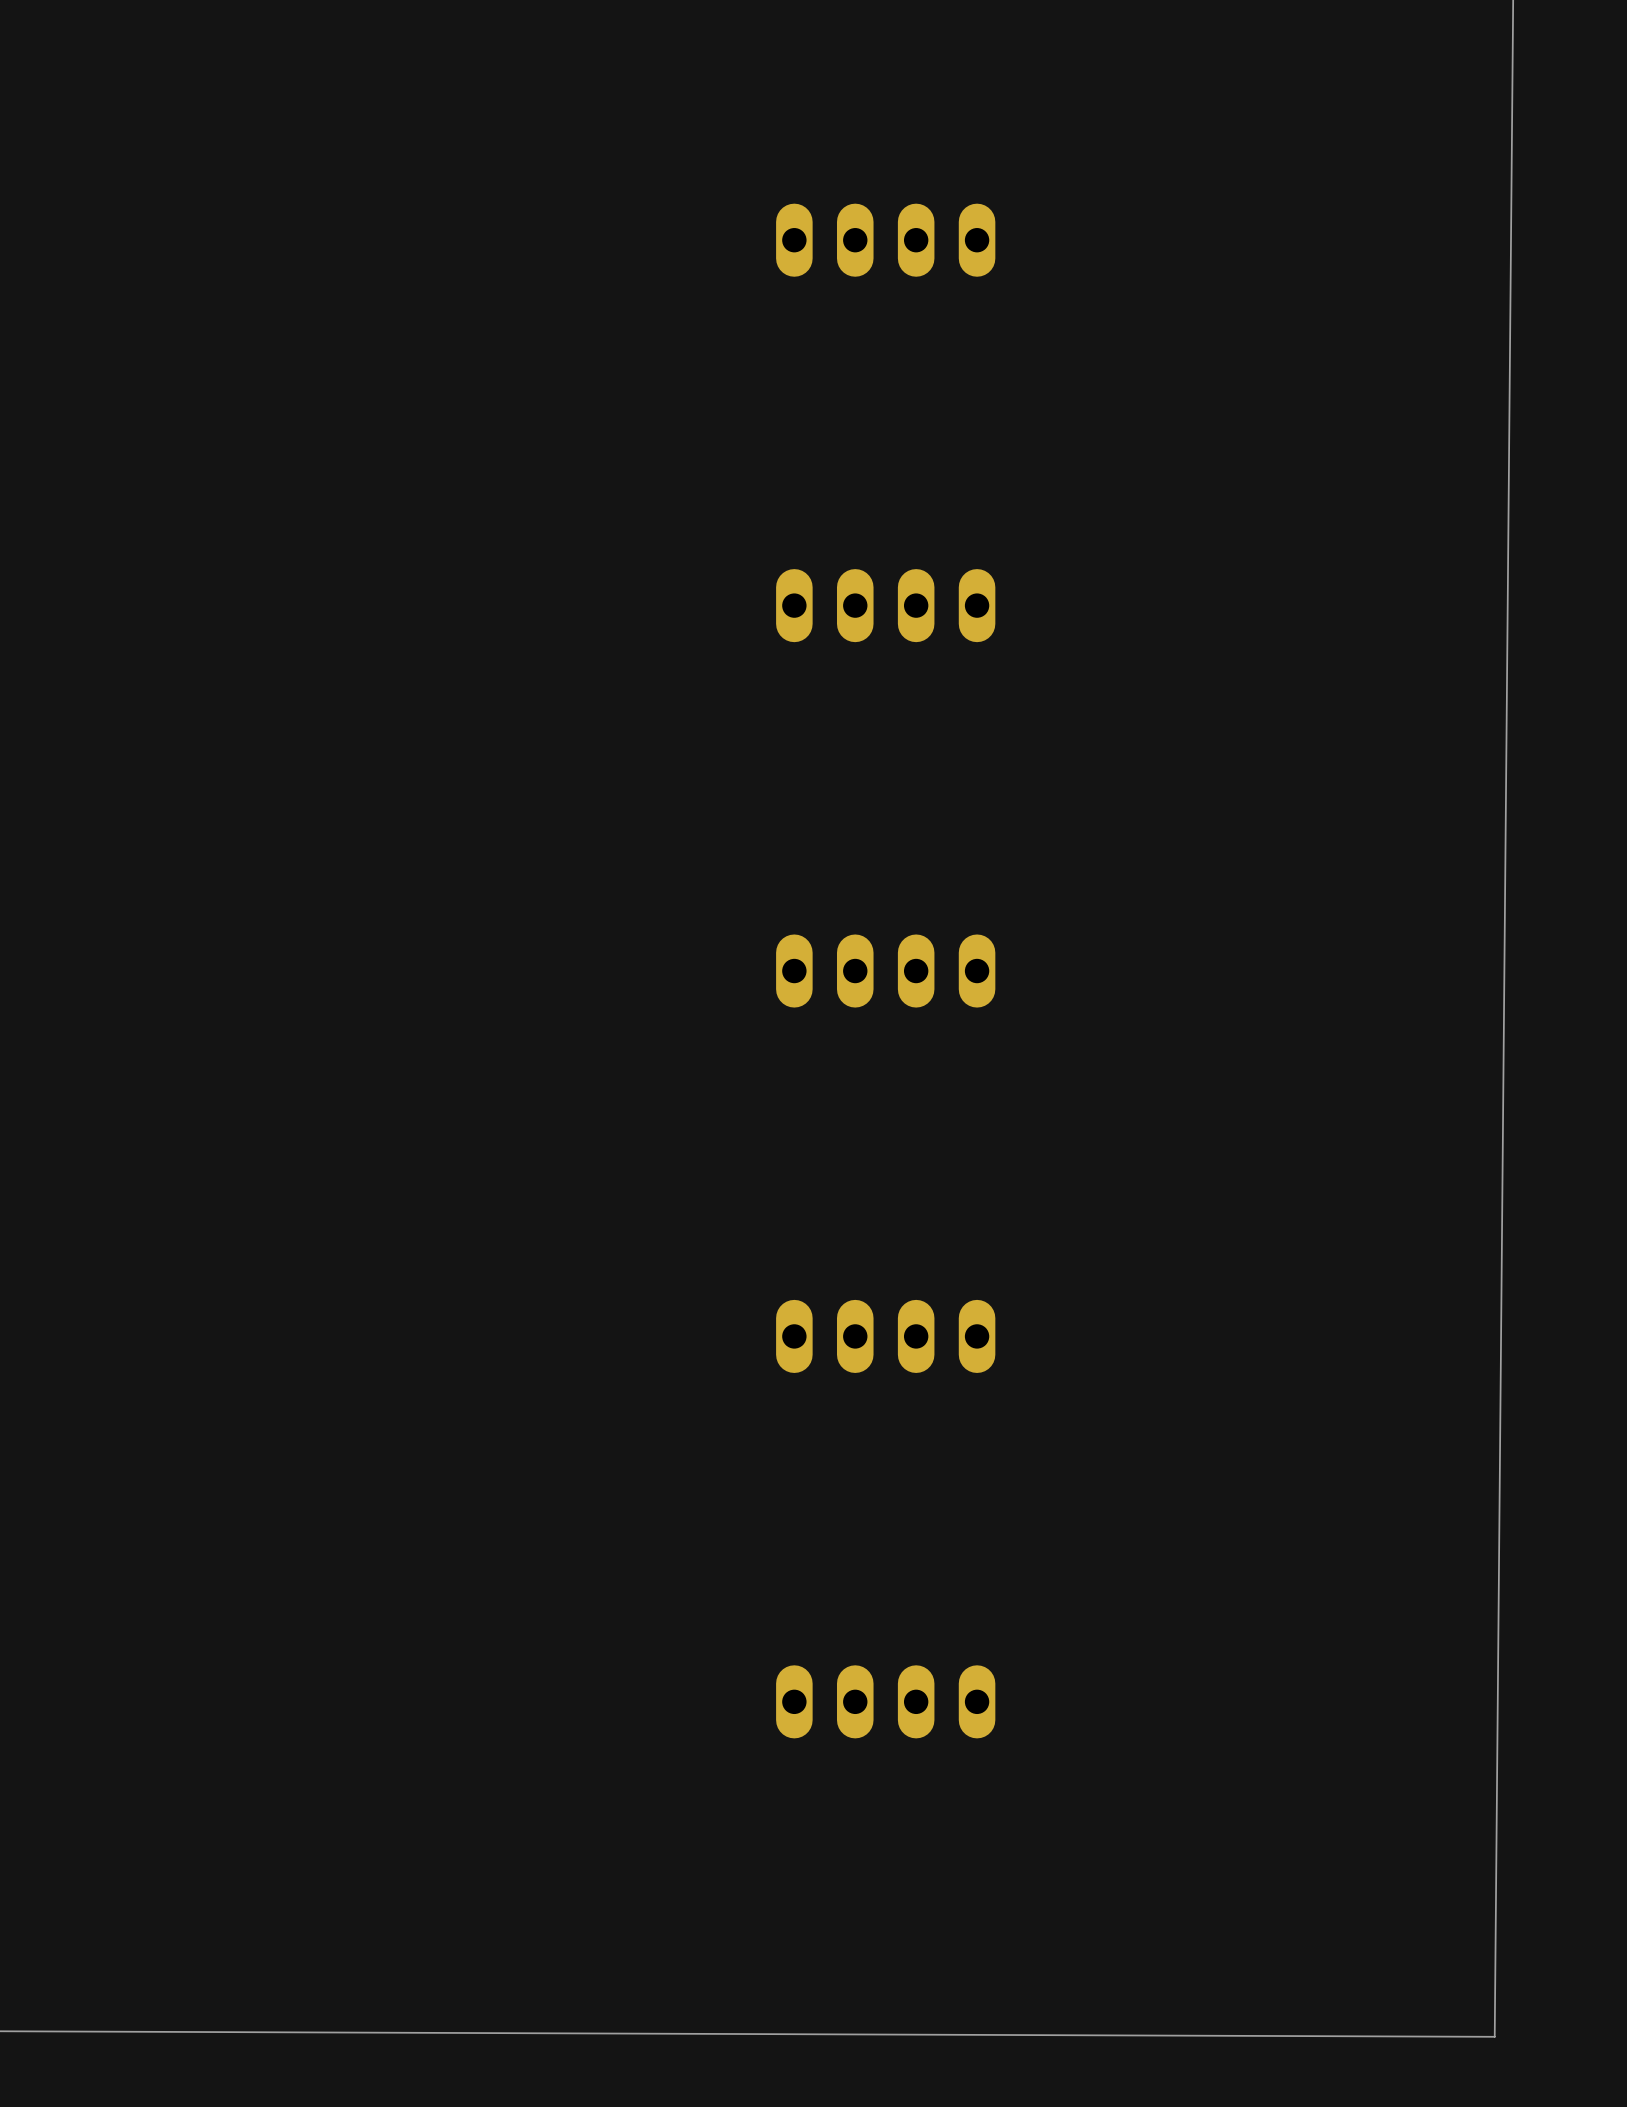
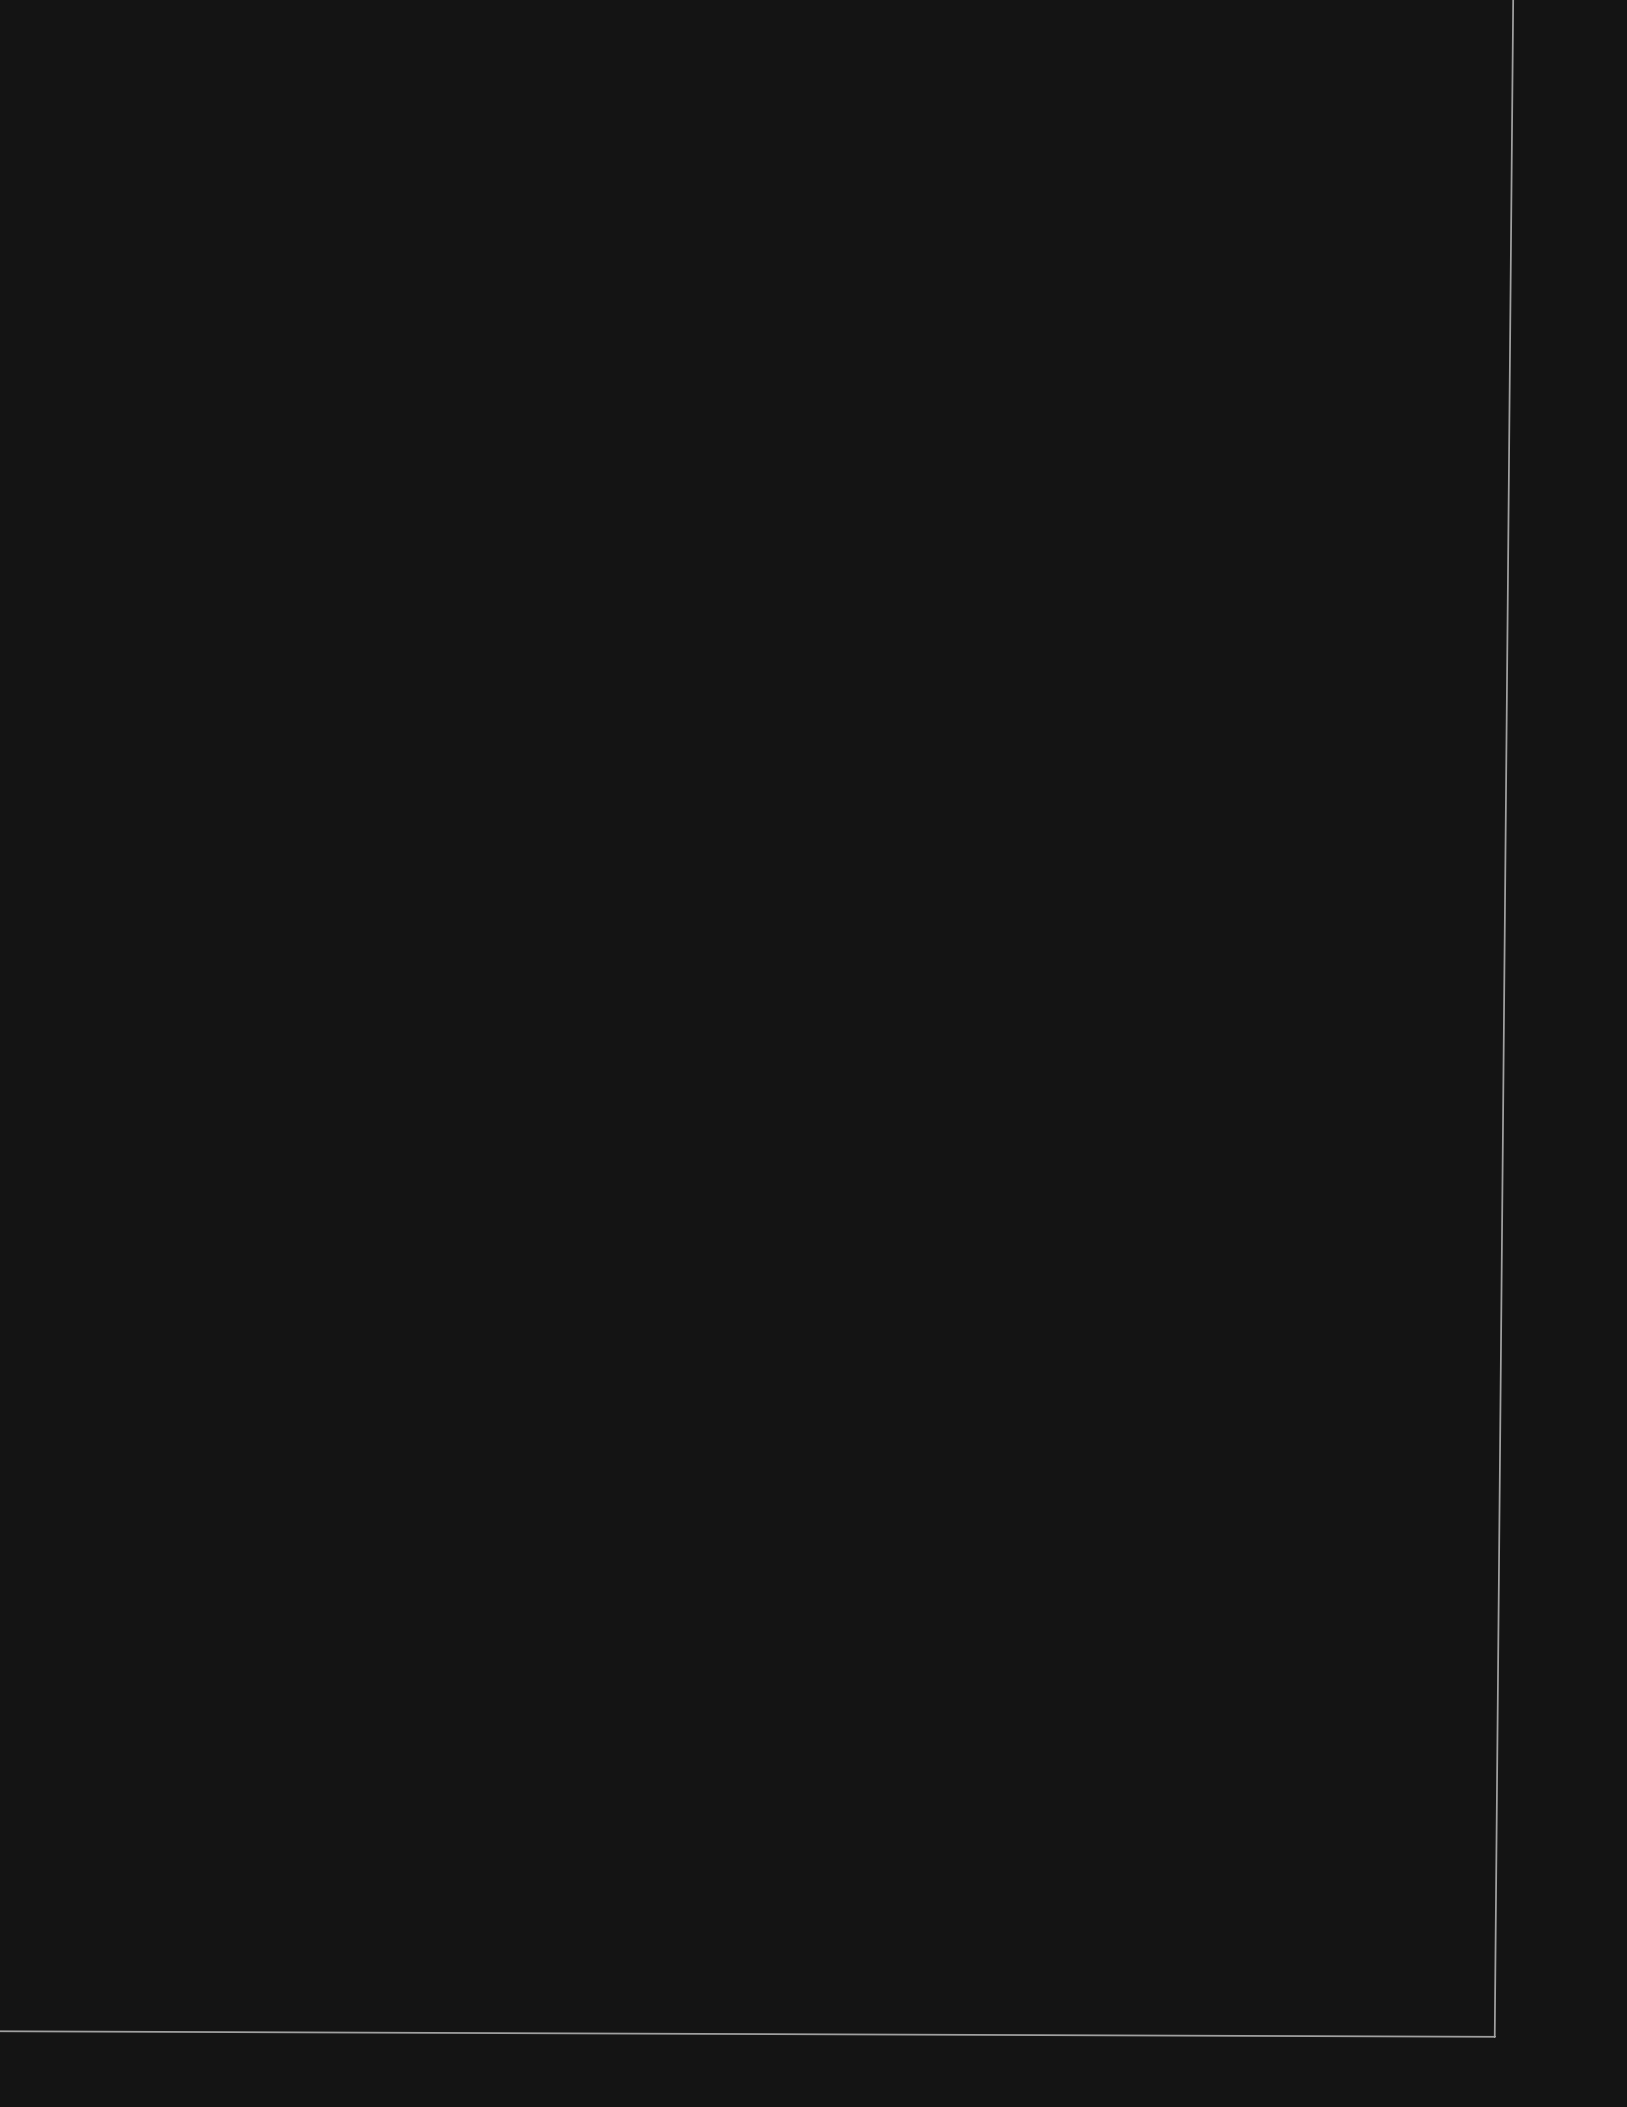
part: (885, 240) -> none
part: (885, 605) -> none
part: (885, 971) -> none
part: (885, 1336) -> none
part: (885, 1701) -> none

